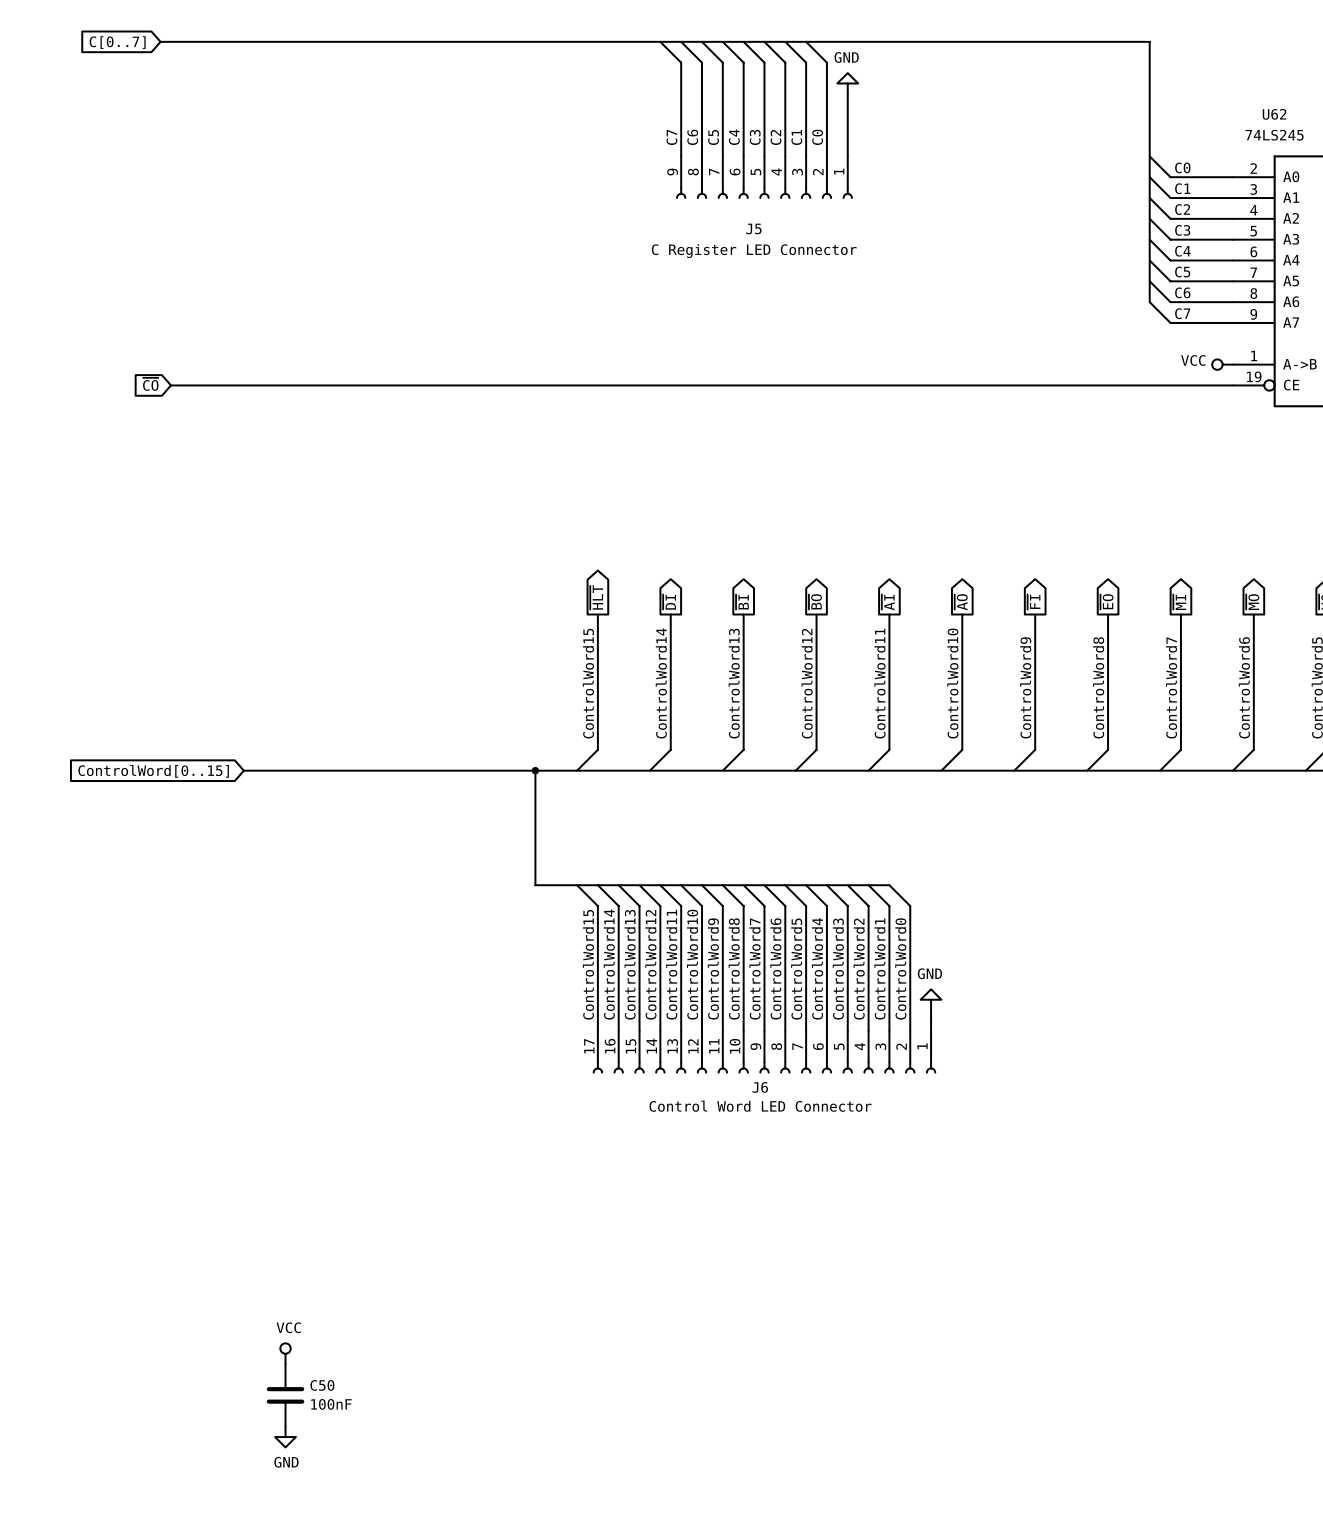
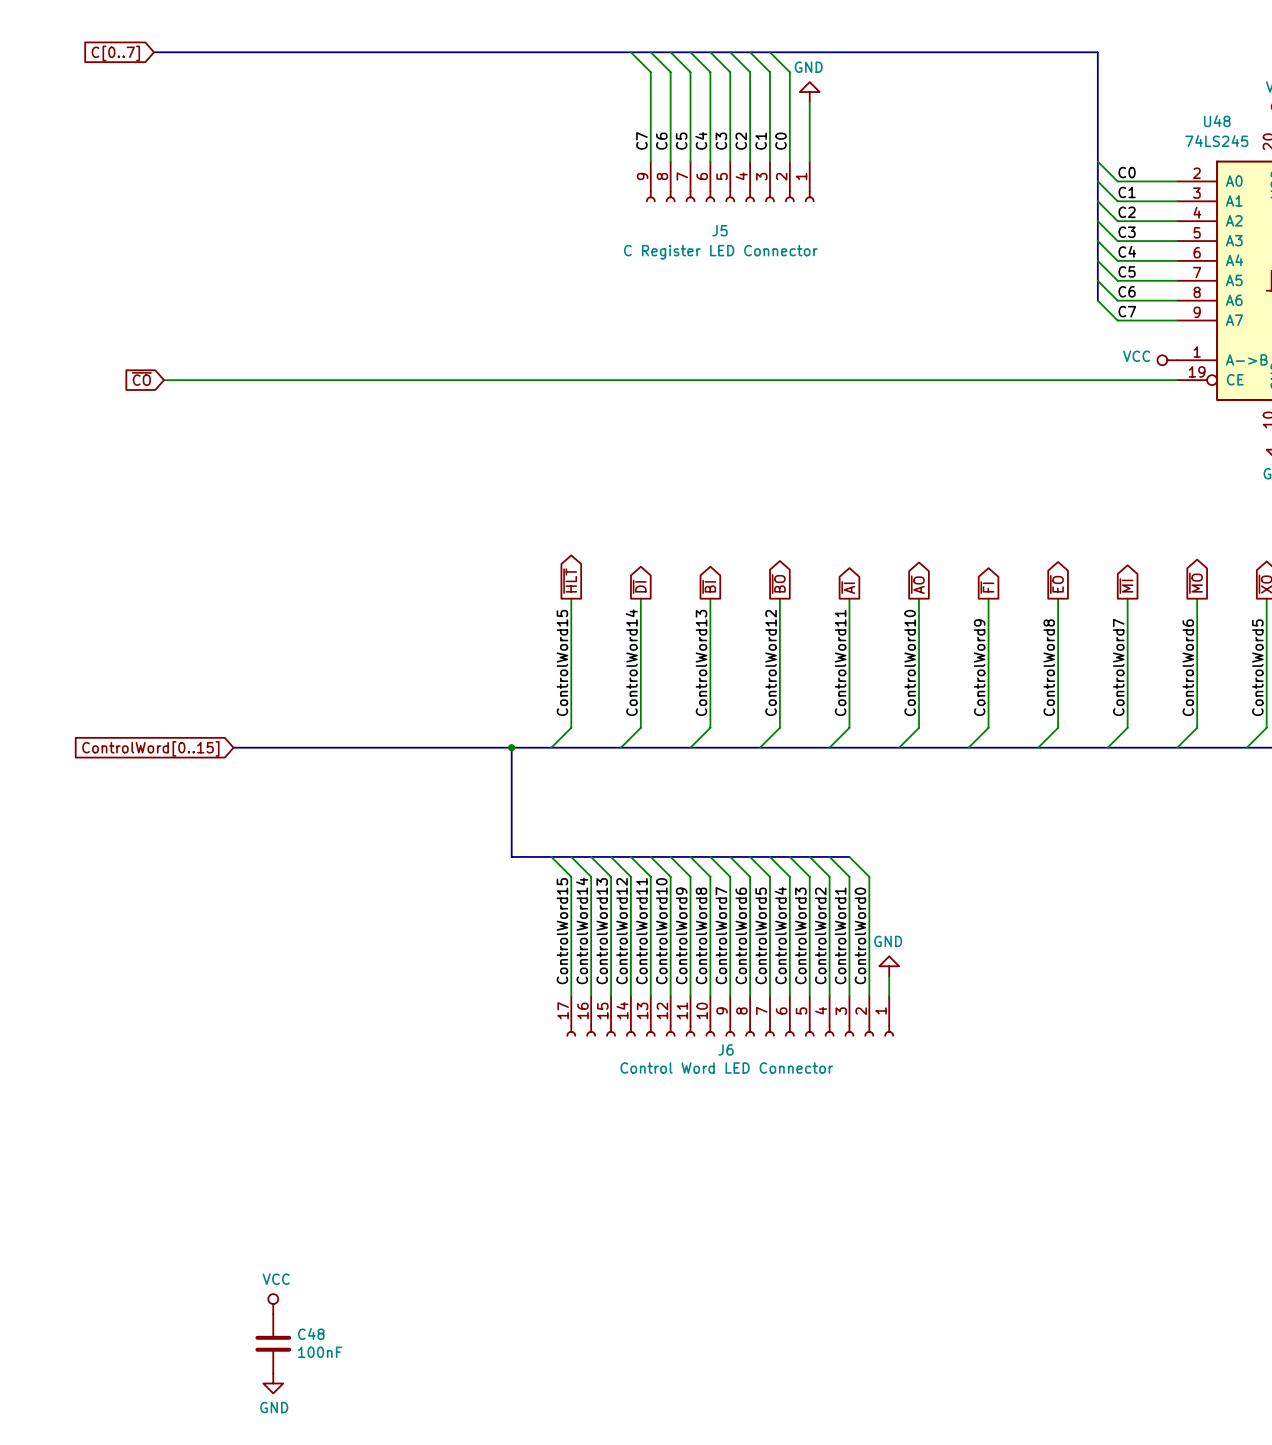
U62 name: U62 (1274, 114) -> U48 (1217, 121)
C50 name: C50 (322, 1385) -> C48 (311, 1334)

